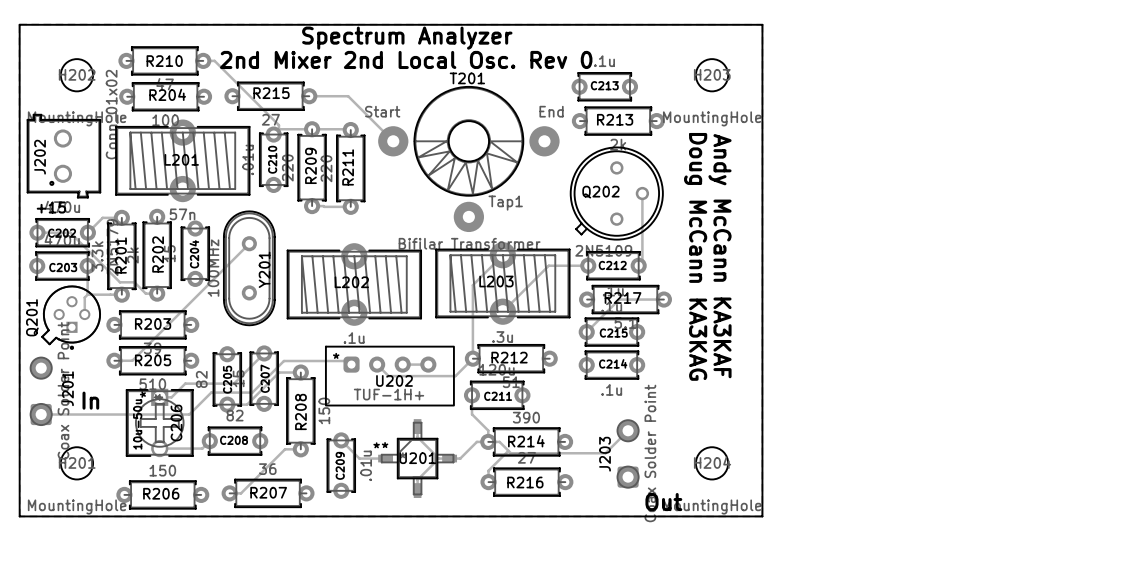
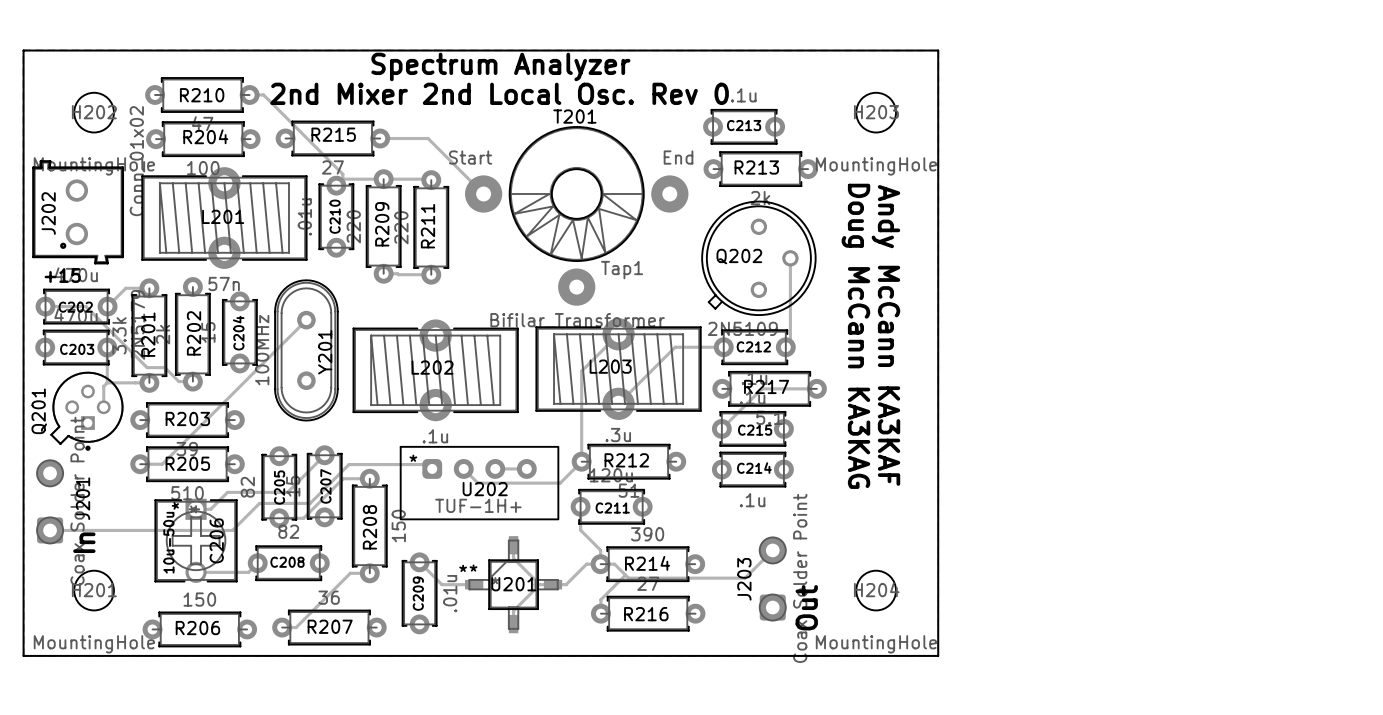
text rotation: 0° (90, 400) -> 90° counterclockwise (84, 542)
text rotation: 0° (663, 502) -> 90° counterclockwise (806, 607)

